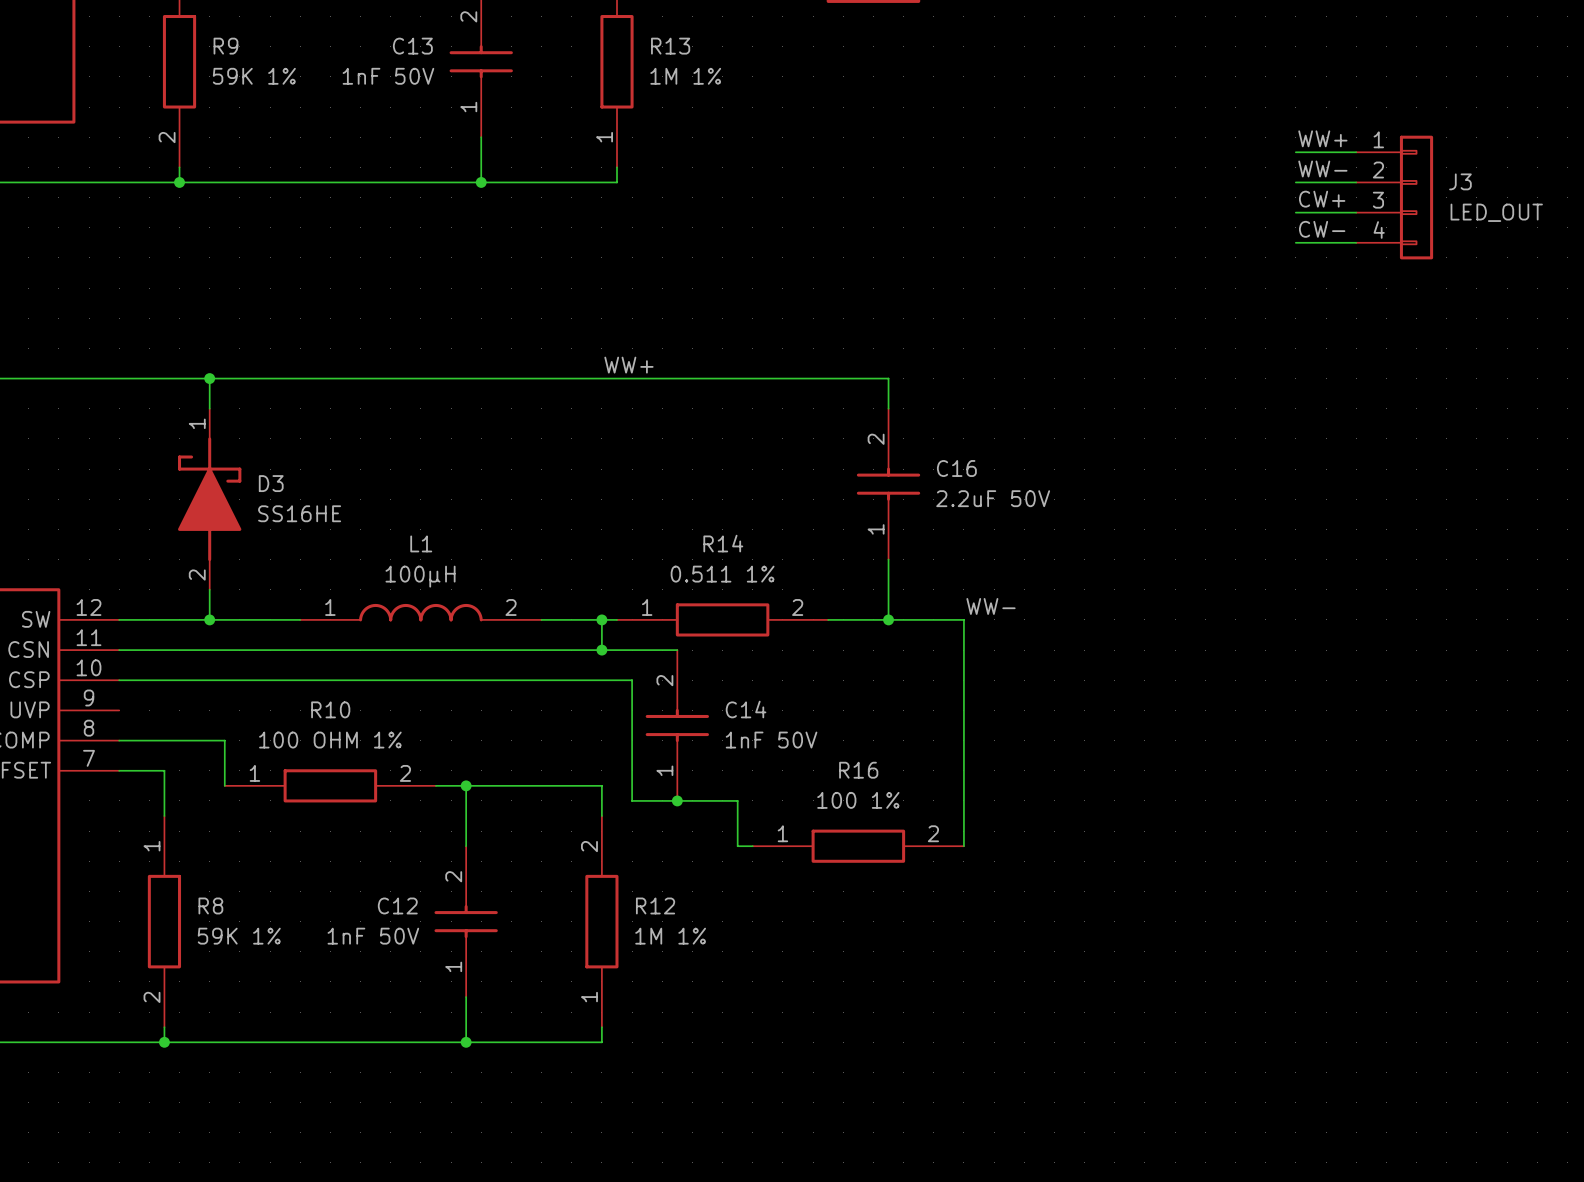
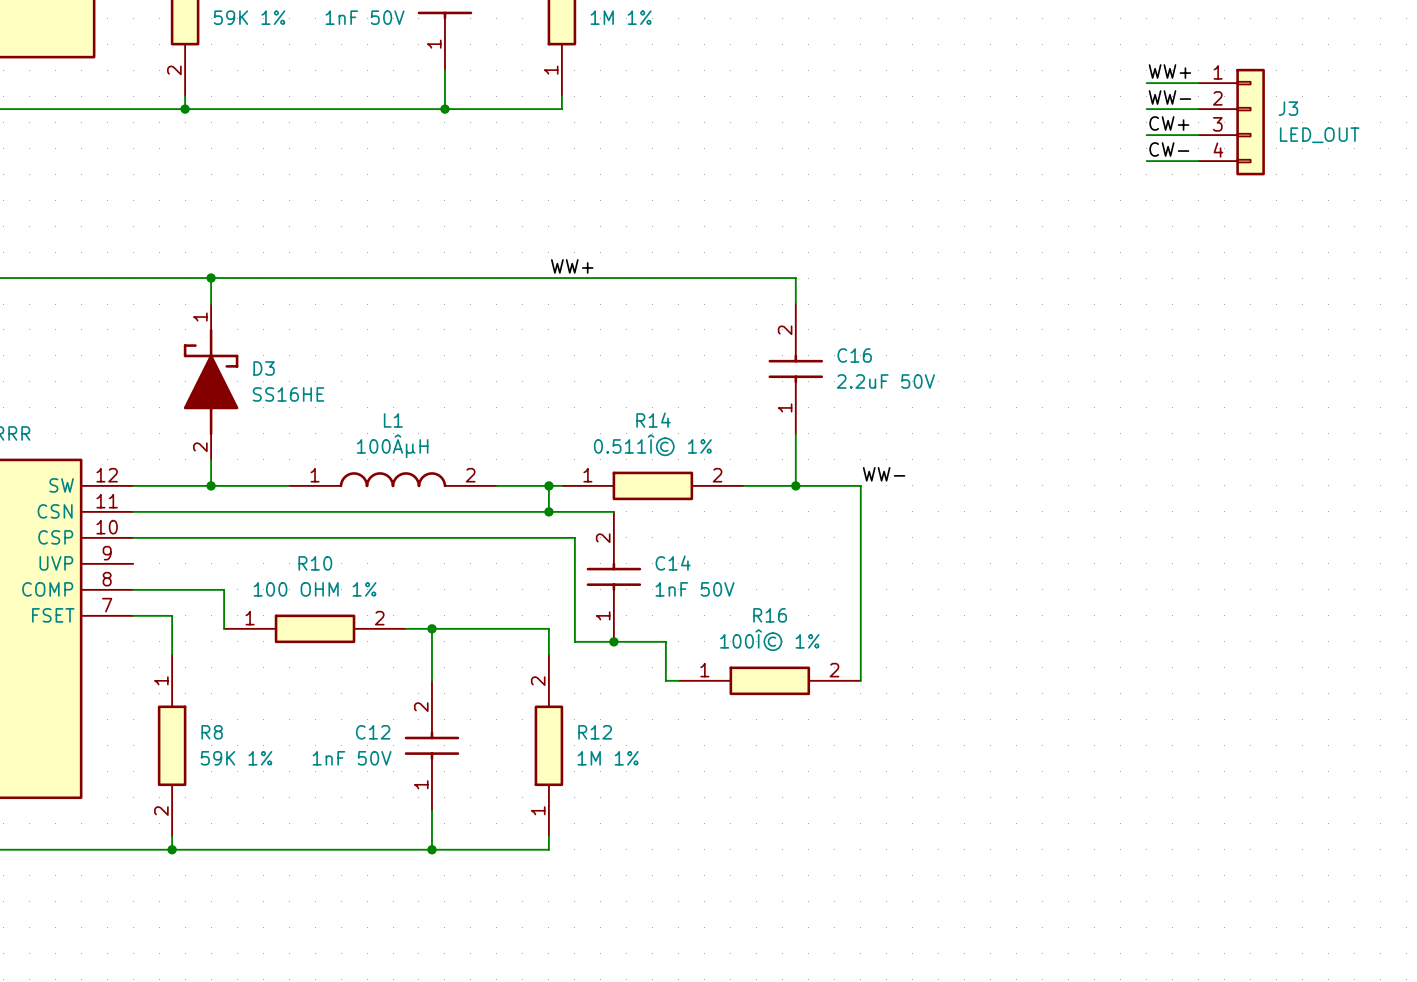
R14 value: 0.511 1% (722, 574) -> 0.511Î© 1% (652, 445)
L1 value: 100µH (420, 576) -> 100ÂµH (392, 446)
R16 value: 100 1% (858, 800) -> 100Î© 1% (769, 640)

